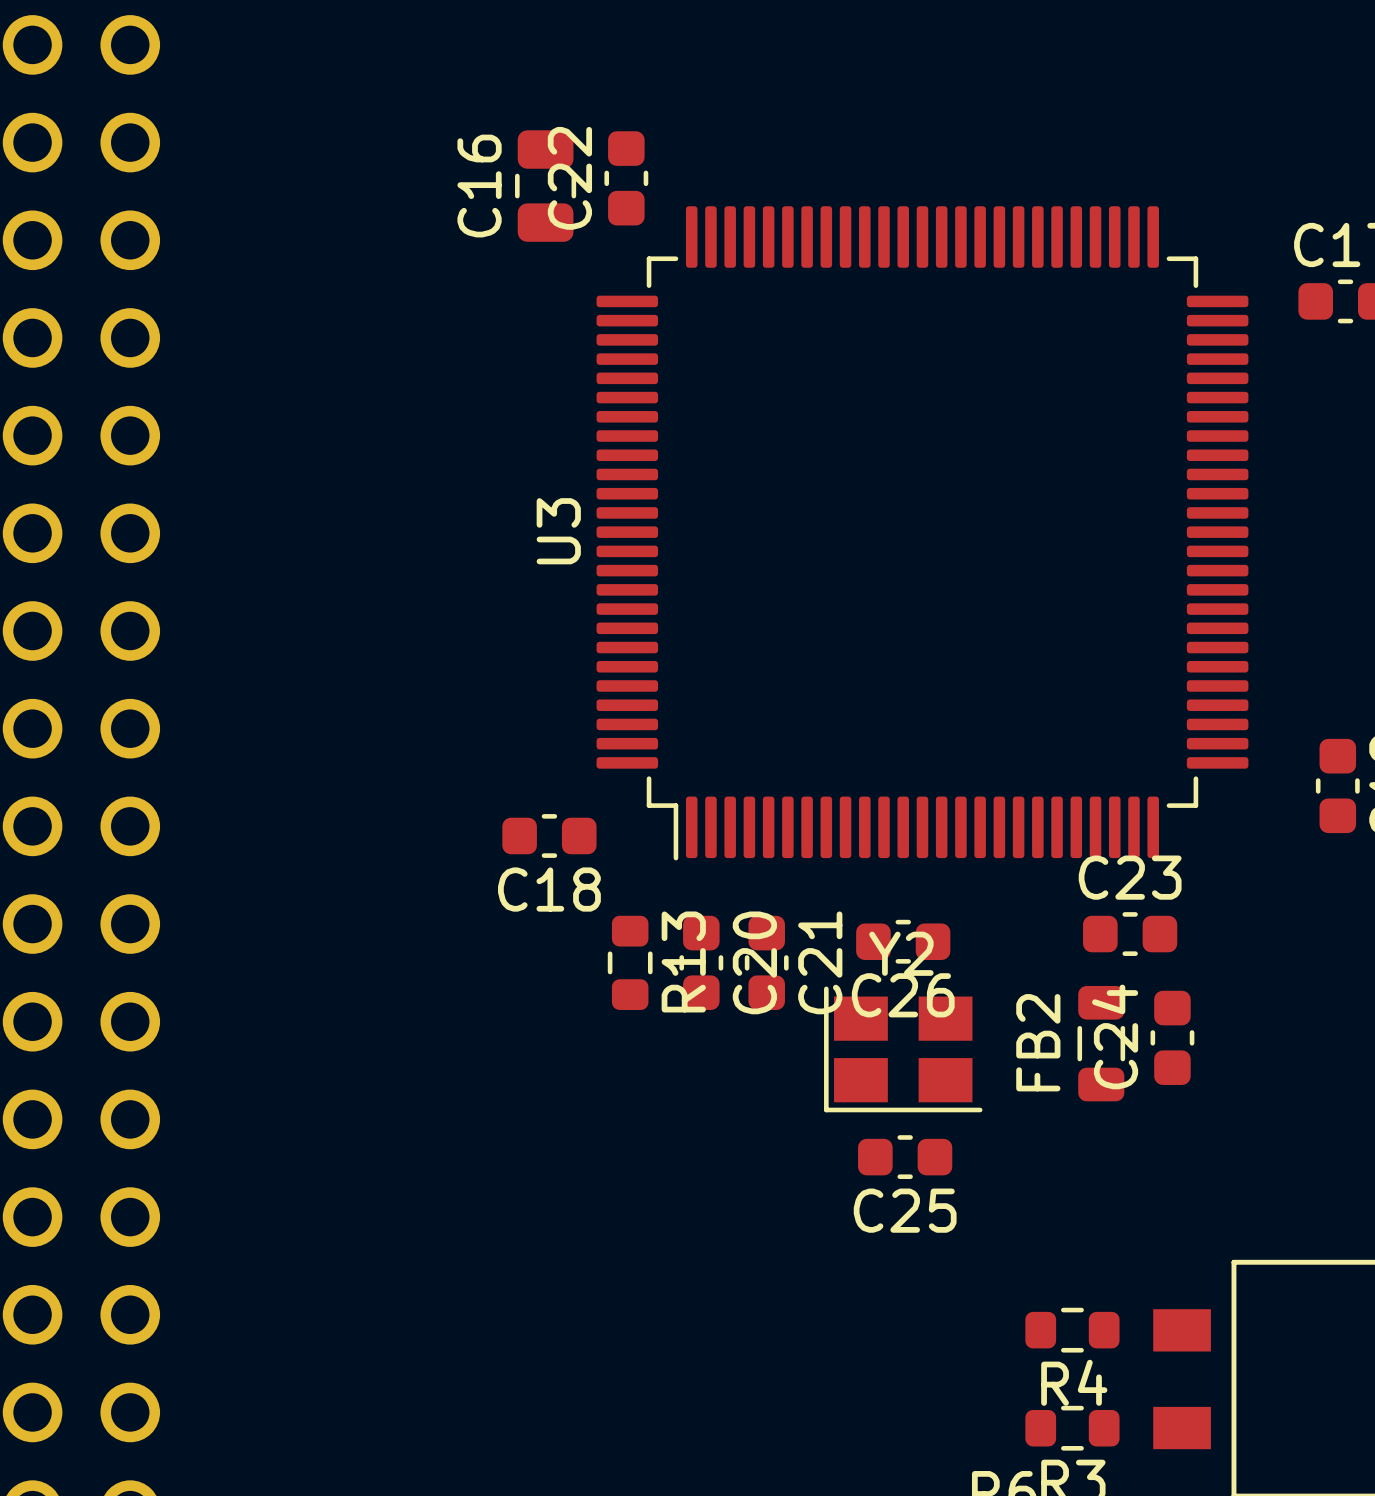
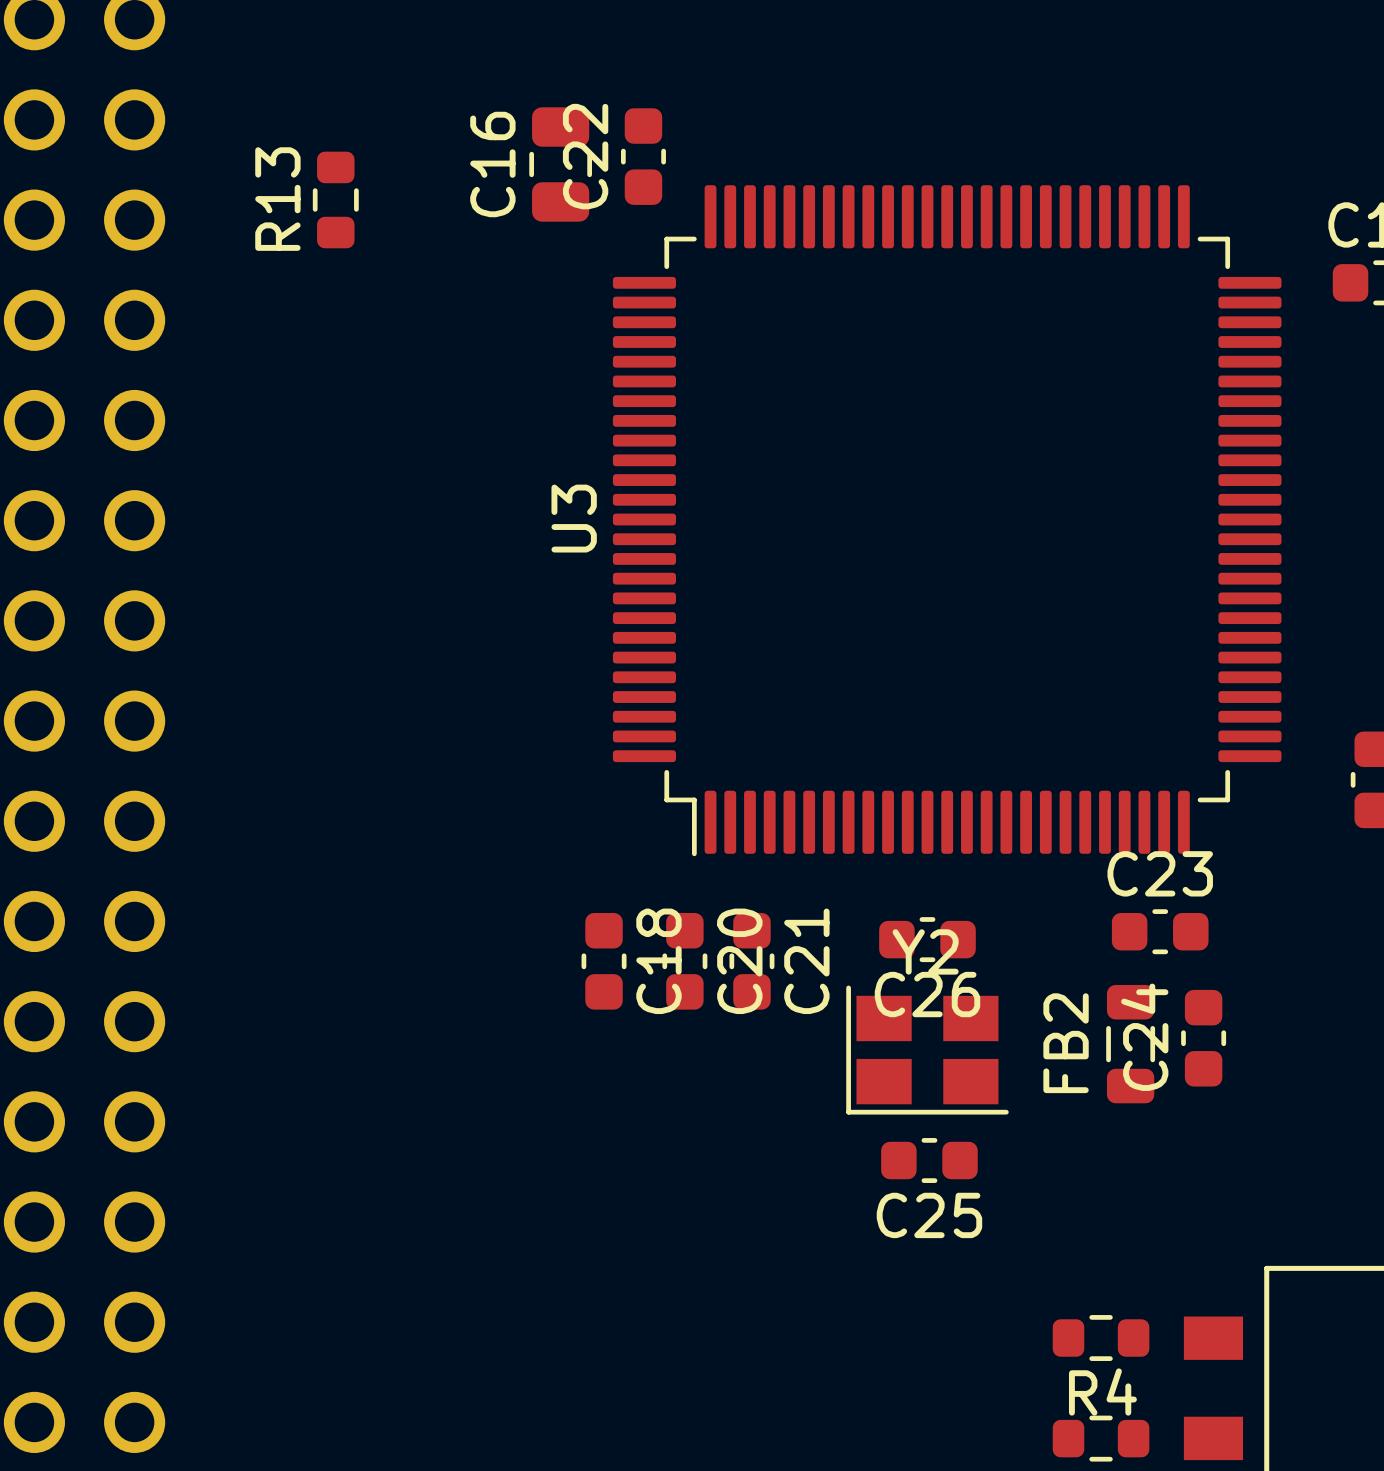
C18 rotation: 0° (549, 835) -> 90° clockwise (604, 961)
C18 position: (549, 835) -> (604, 961)
C18 name position: C18 (549, 889) -> C18 (658, 961)
R13 name position: R13 (683, 961) -> R13 (277, 199)
R13 position: (630, 962) -> (335, 199)
C20 position: (701, 962) -> (684, 961)
C21 position: (766, 962) -> (751, 961)

